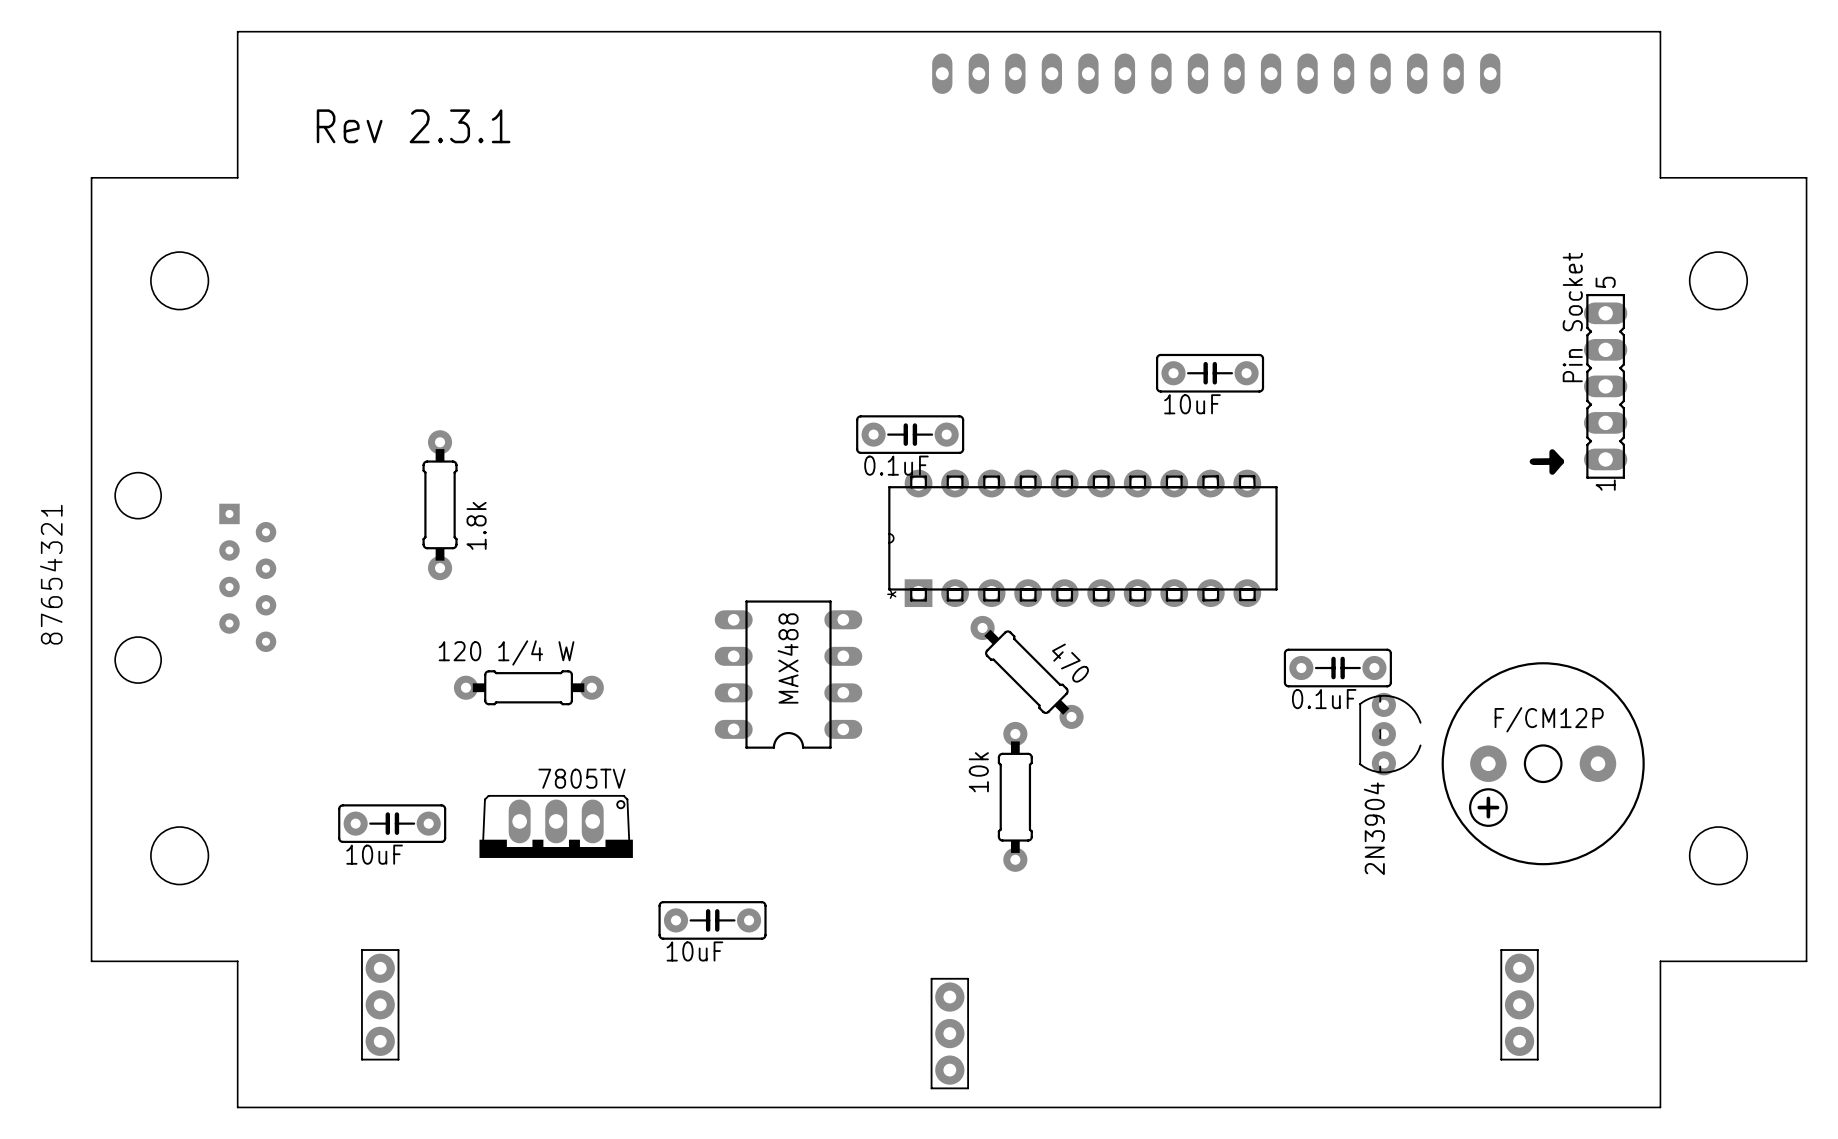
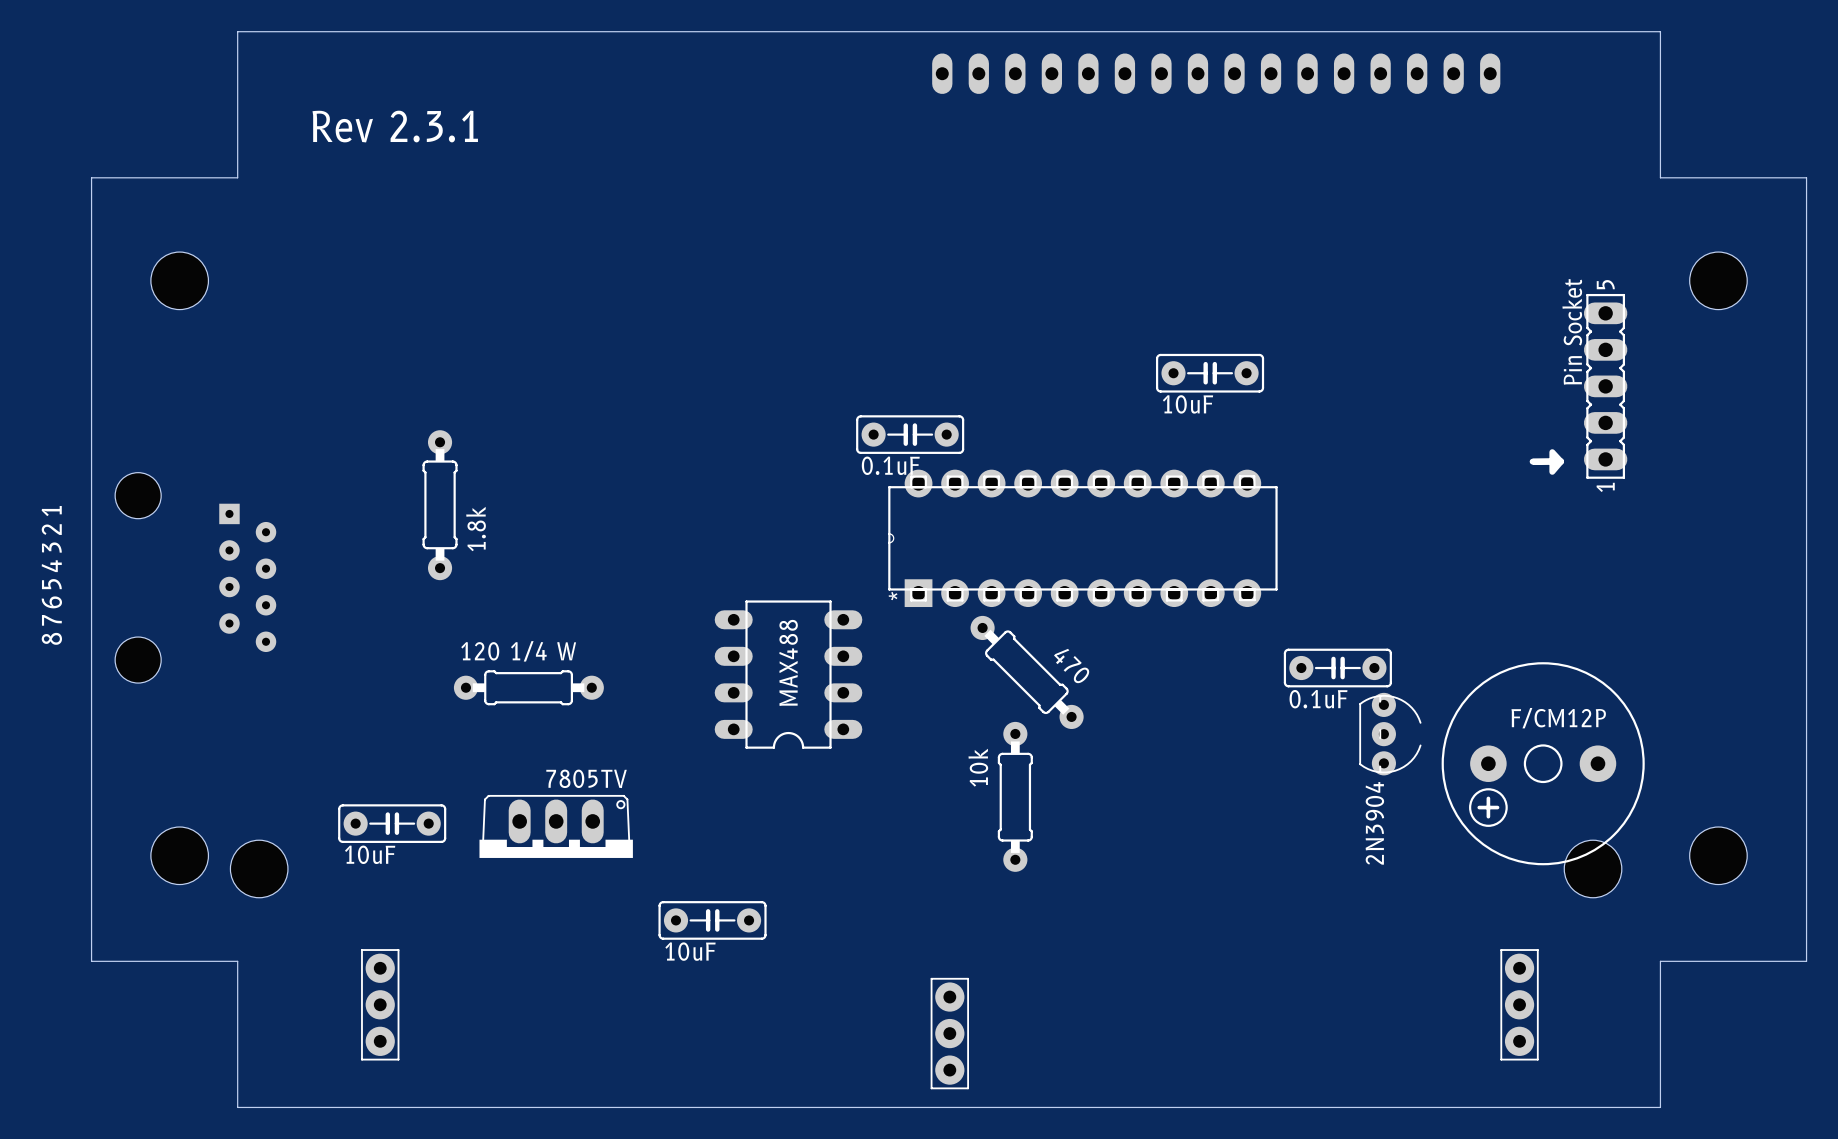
hole: none -> (259, 868)
hole: none -> (1593, 868)

